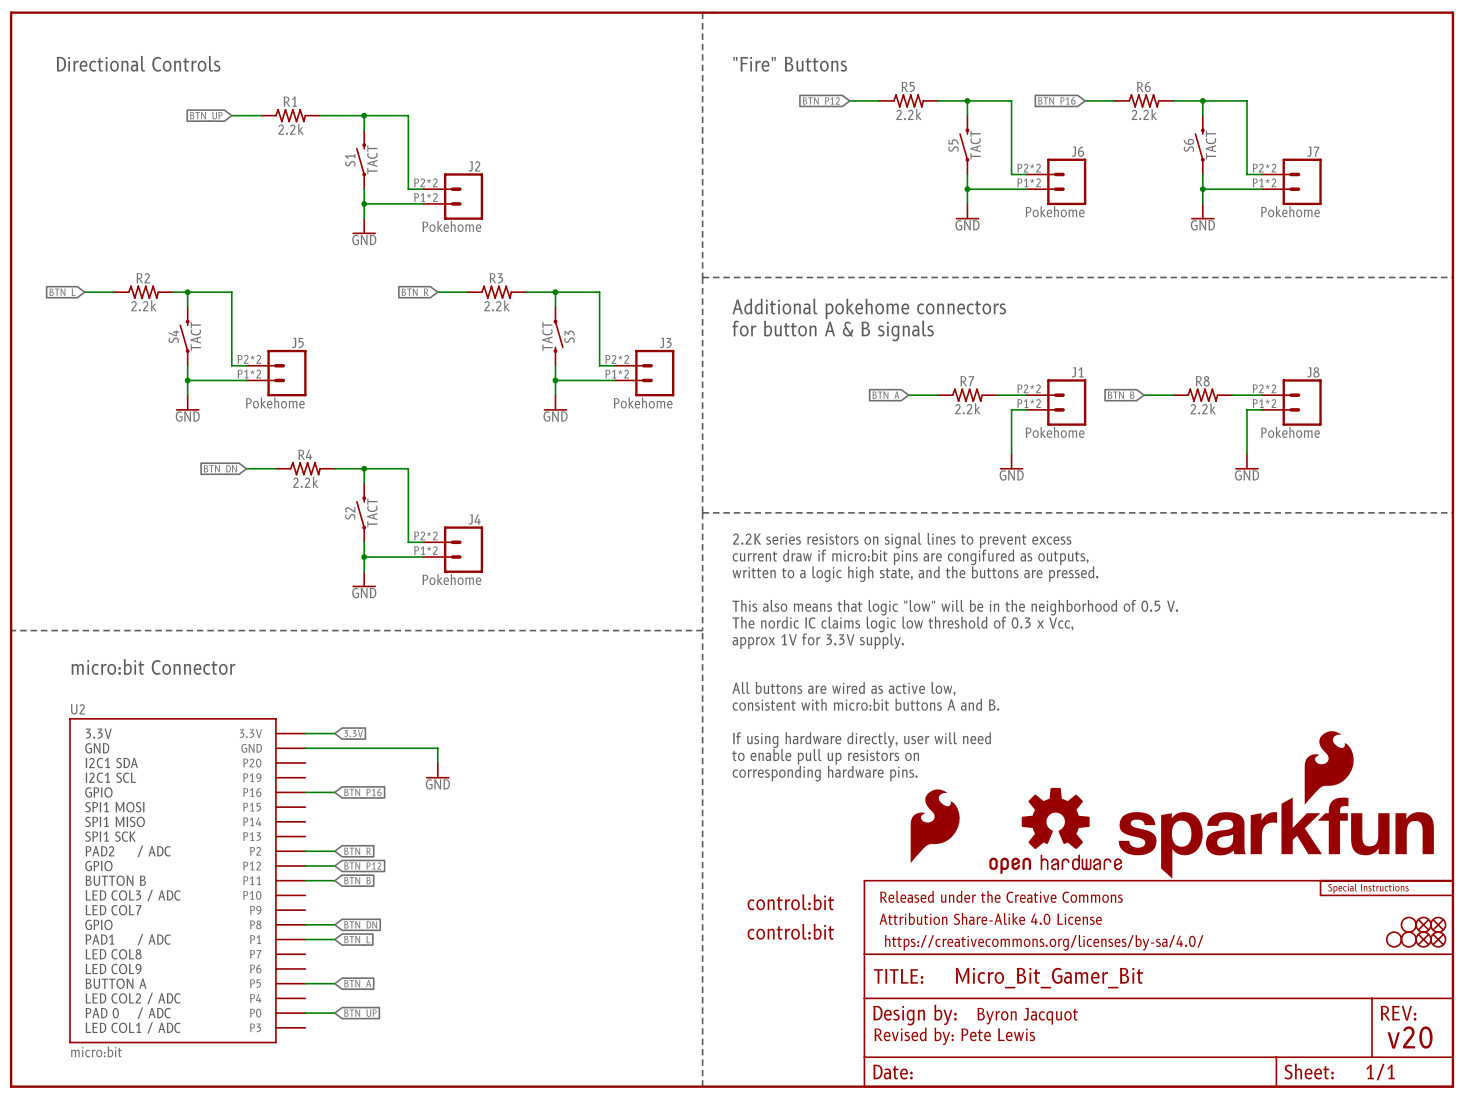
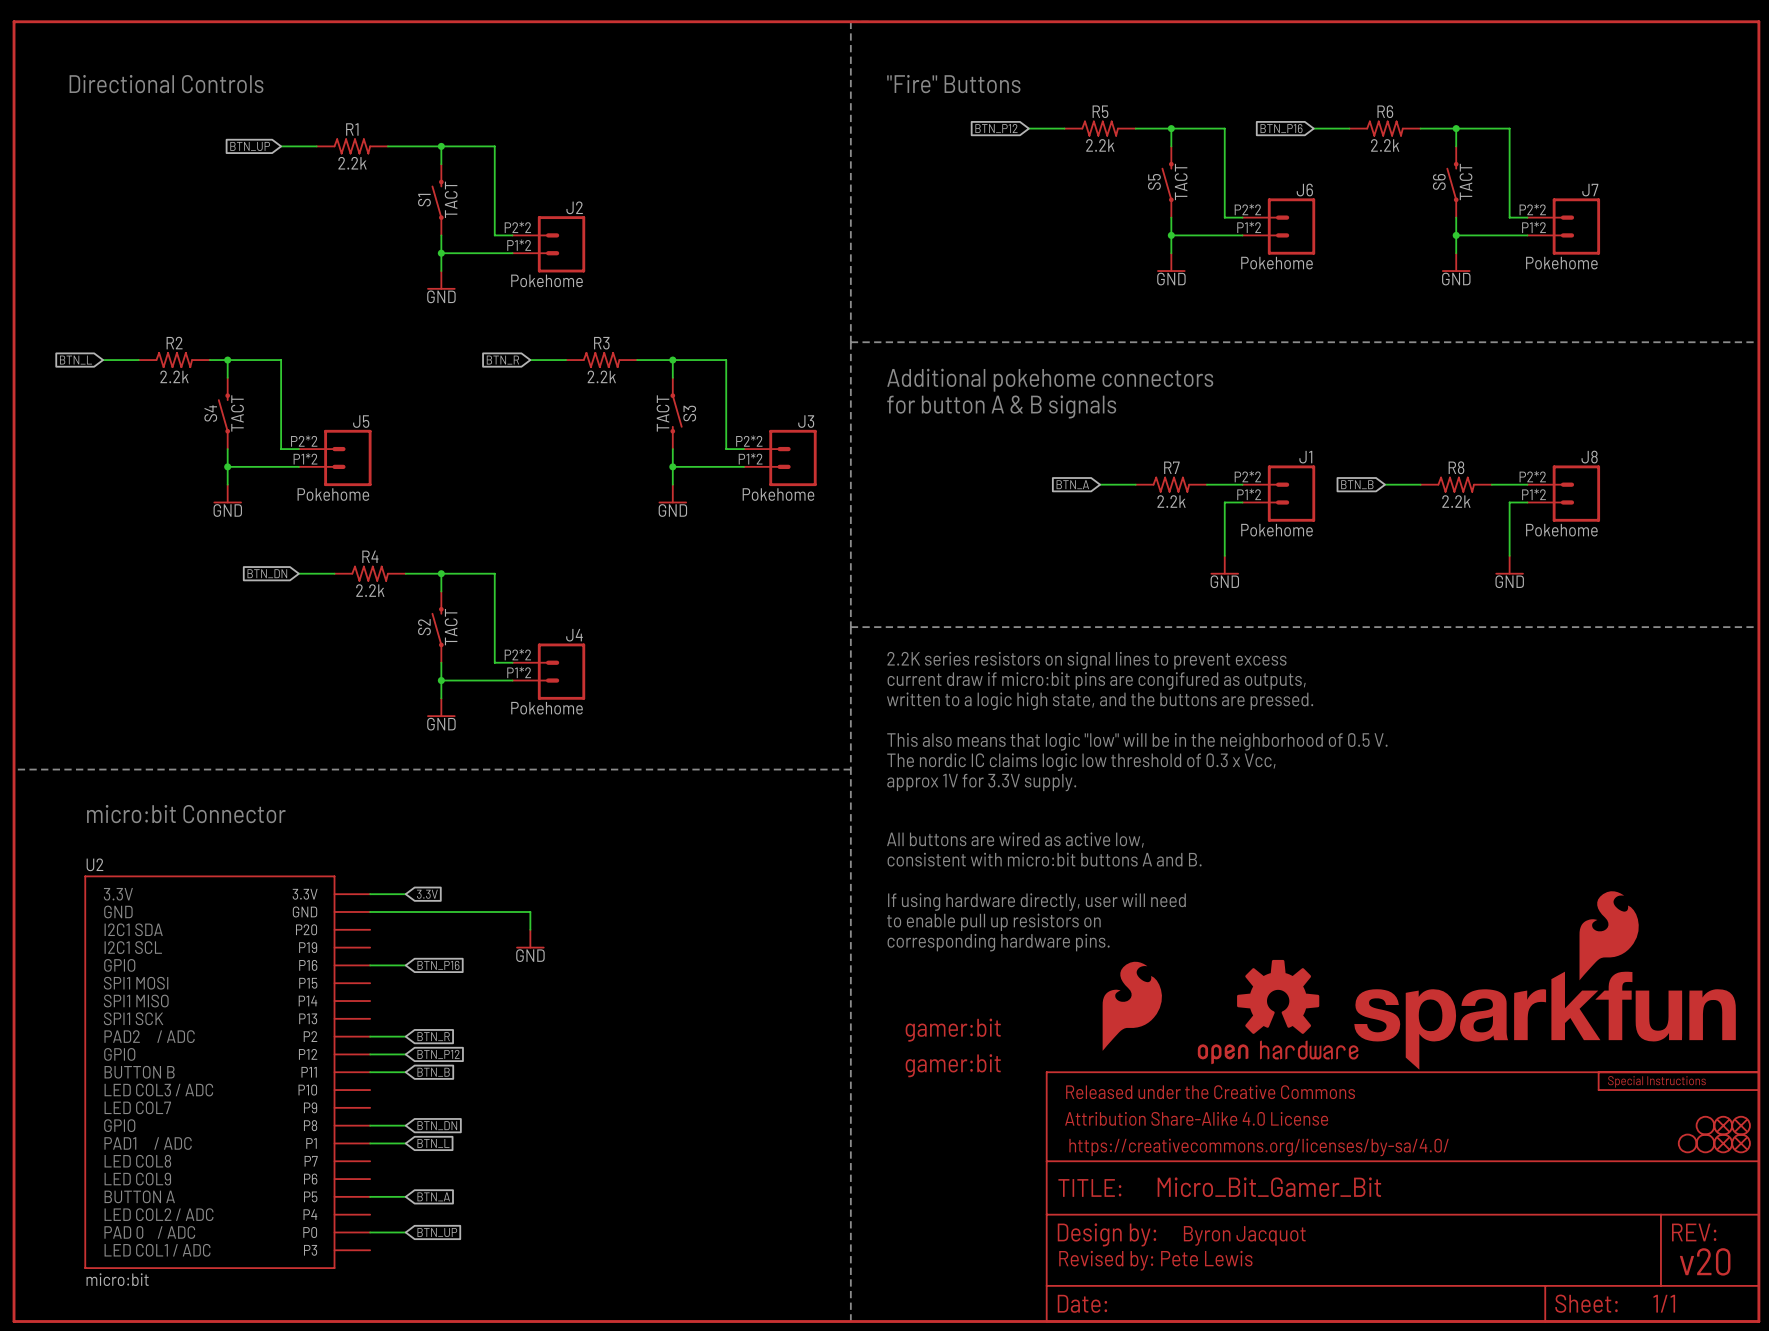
part: none -> (953, 1030)
part: none -> (953, 1065)
part: (790, 902) -> none
part: (790, 931) -> none

